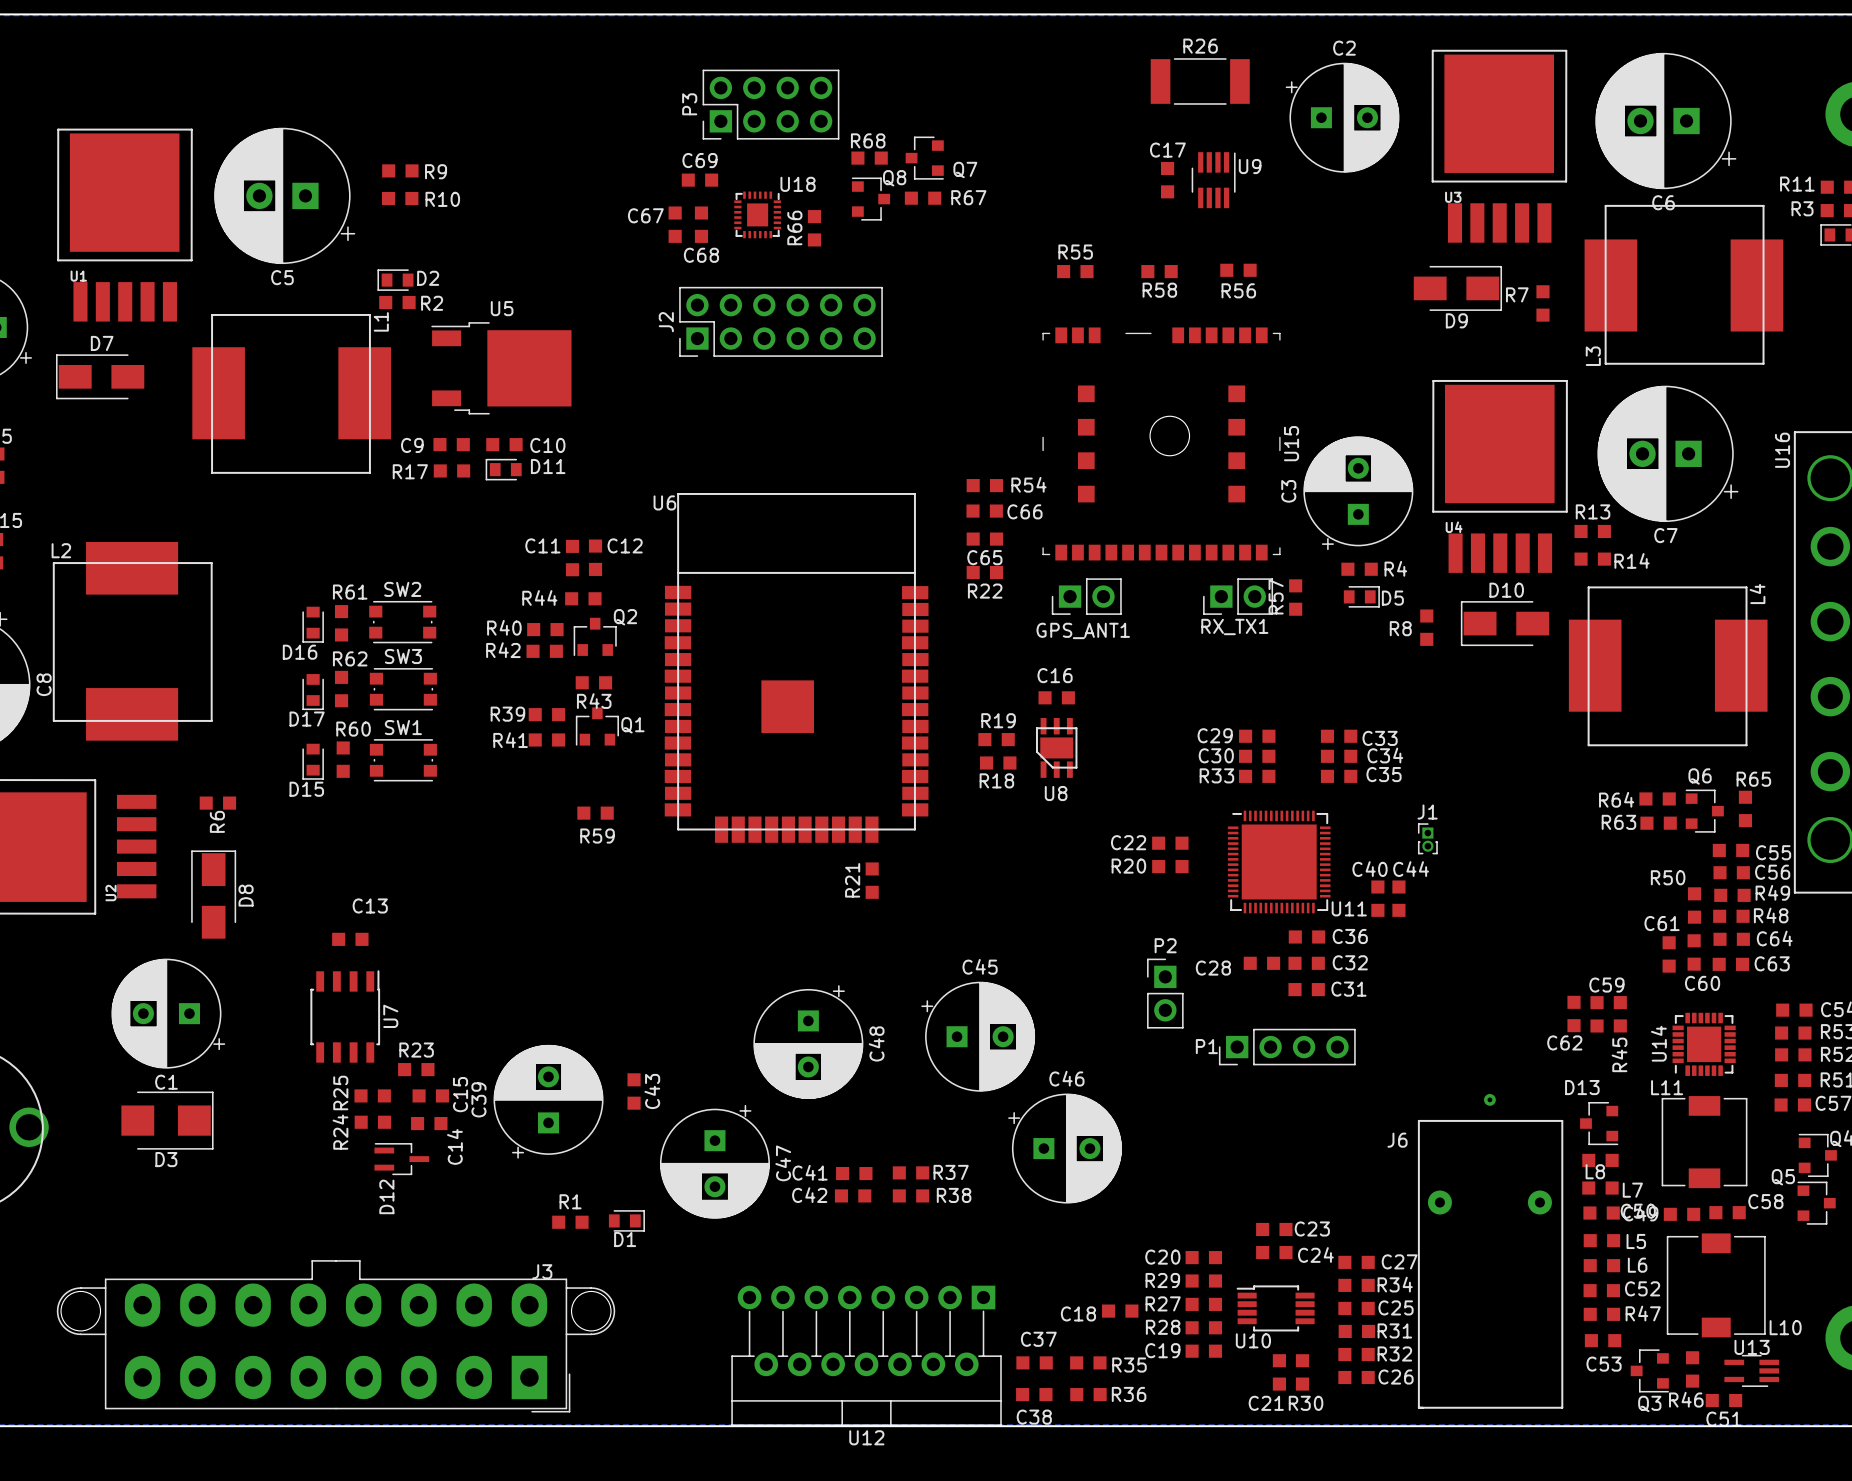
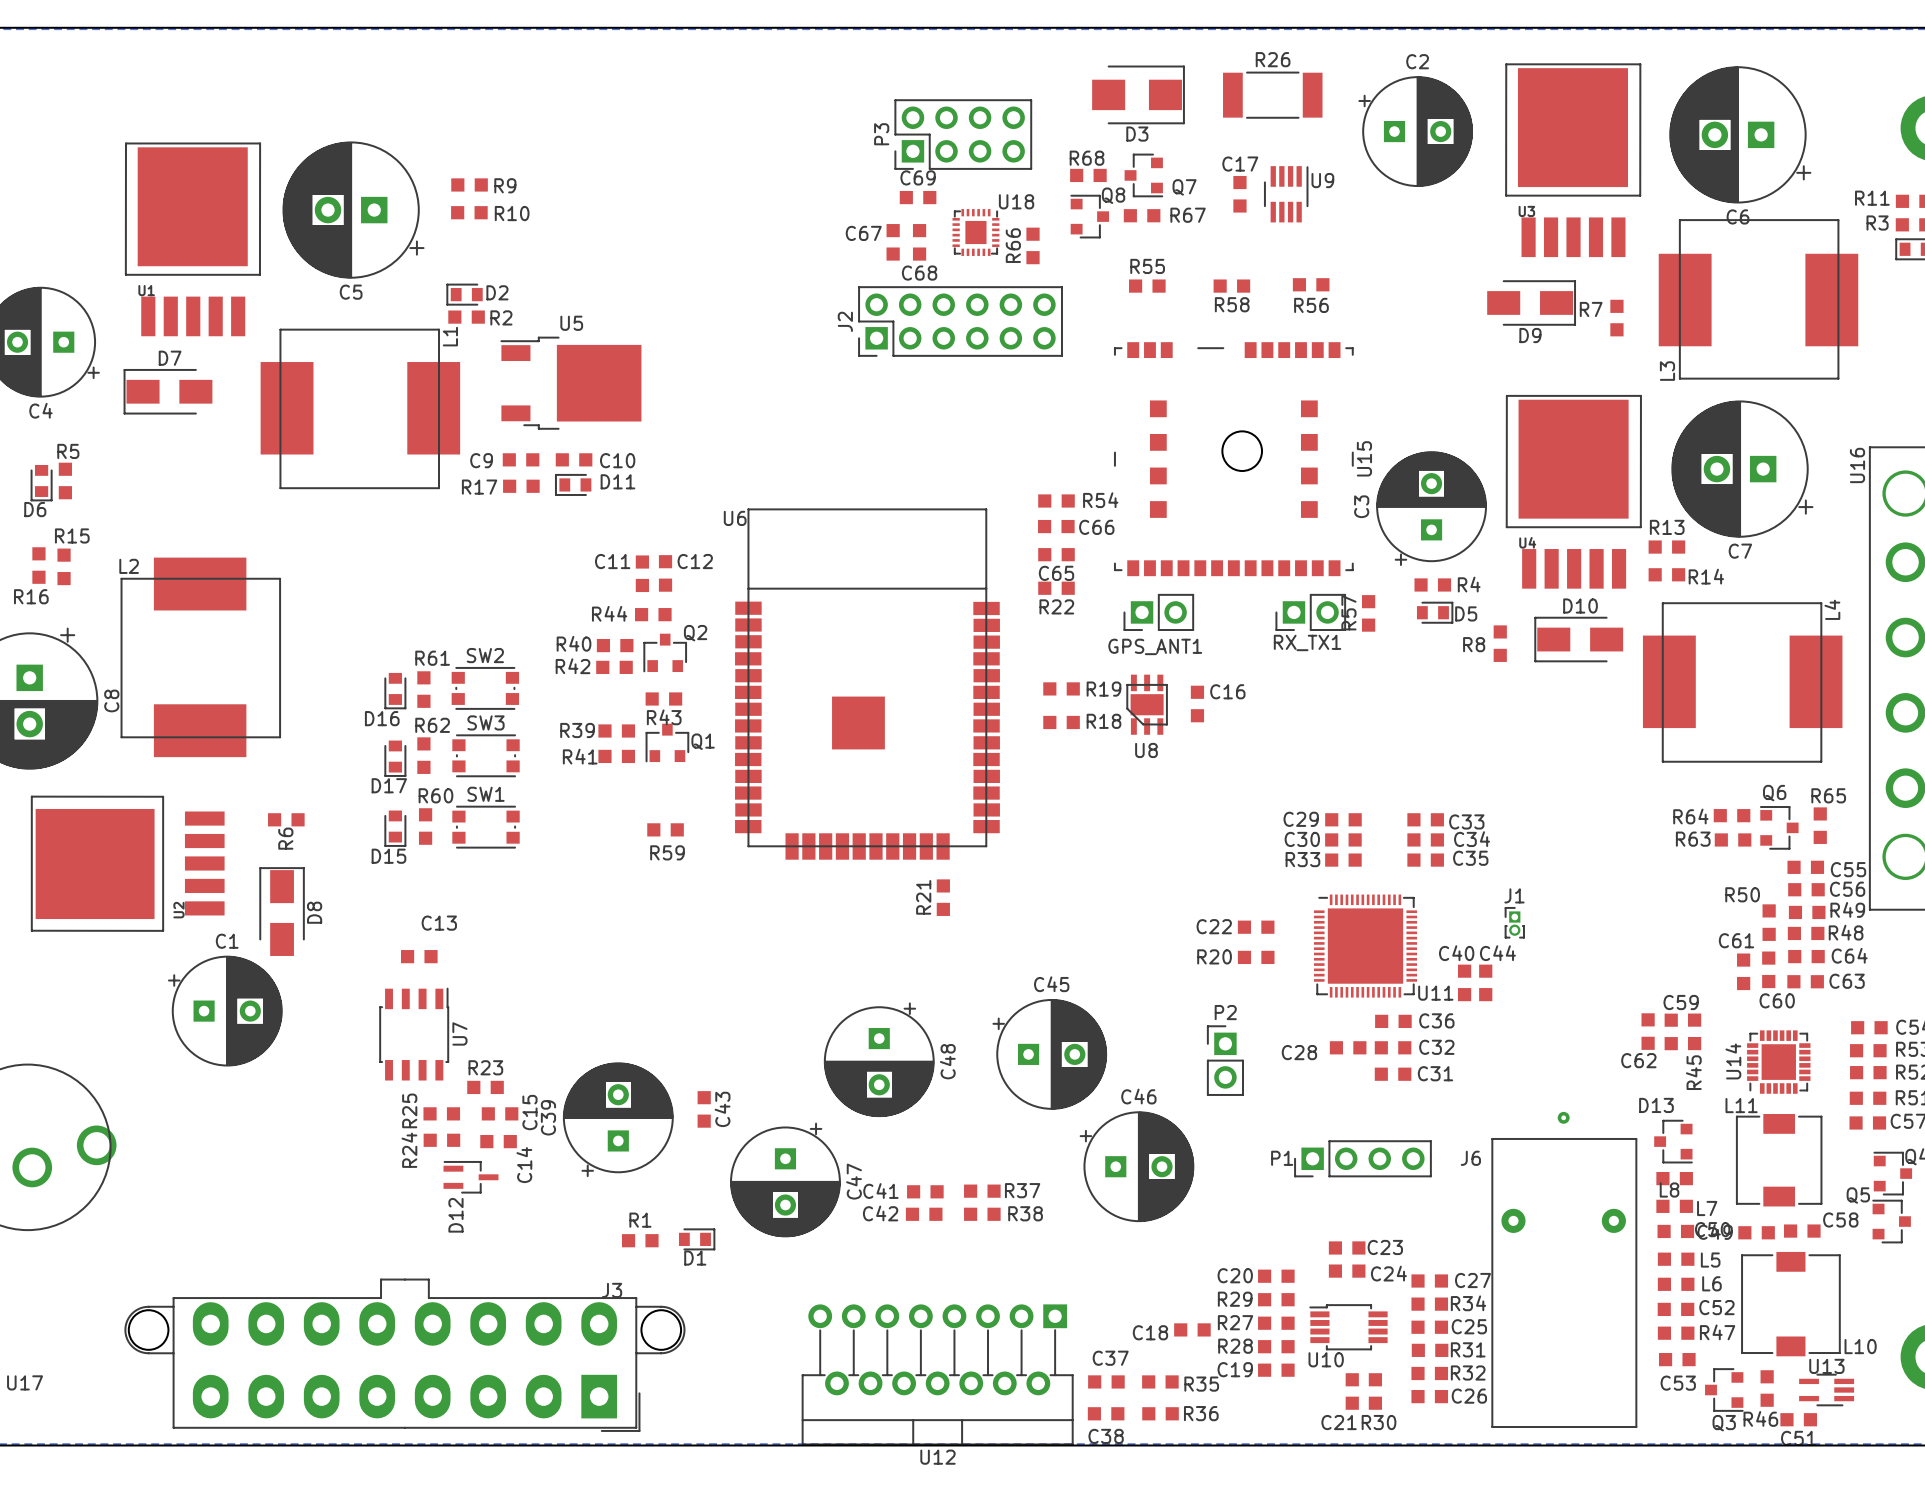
P3 position: (770, 104) -> (963, 134)
R68 position: (869, 158) -> (1088, 175)
Q7 position: (924, 158) -> (1143, 175)
C69 position: (699, 180) -> (918, 197)
R67 position: (923, 198) -> (1142, 215)
Q8 position: (870, 199) -> (1089, 216)
U18 position: (757, 214) -> (975, 232)
C67 position: (675, 224) -> (893, 242)
C68 position: (701, 224) -> (919, 242)
R66 position: (814, 228) -> (1033, 245)
J2 position: (781, 321) -> (960, 321)
SW2 position: (402, 622) -> (485, 688)
R61 position: (341, 623) -> (423, 689)
D16 position: (313, 624) -> (395, 691)
R62 position: (341, 689) -> (423, 755)
SW3 position: (403, 689) -> (486, 755)
D17 position: (313, 692) -> (395, 758)
C16 rotation: 0° (1056, 697) -> 90° clockwise (1197, 704)
C16 position: (1056, 697) -> (1197, 704)
R19 name position: R19 (998, 720) -> R19 (1103, 689)
C29 position: (1257, 736) -> (1343, 819)
C33 position: (1339, 736) -> (1425, 819)
R19 position: (996, 739) -> (1061, 688)
U8 position: (1056, 747) -> (1147, 704)
C30 position: (1257, 756) -> (1343, 839)
C34 position: (1339, 756) -> (1425, 839)
R60 position: (343, 759) -> (425, 826)
SW1 position: (403, 760) -> (486, 827)
D15 position: (313, 761) -> (395, 828)
R18 position: (998, 762) -> (1061, 722)
R33 position: (1257, 776) -> (1343, 860)
C35 position: (1339, 776) -> (1425, 860)
R18 name position: R18 (996, 780) -> R18 (1103, 721)
J1 position: (1427, 838) -> (1514, 922)
C22 position: (1170, 843) -> (1256, 927)
U11 position: (1279, 861) -> (1365, 946)
R20 position: (1170, 866) -> (1256, 957)
C40 position: (1377, 898) -> (1464, 982)
C44 position: (1398, 898) -> (1485, 982)
C36 position: (1307, 936) -> (1393, 1021)
C28 position: (1261, 963) -> (1348, 1047)
C32 position: (1306, 963) -> (1393, 1047)
C31 position: (1306, 989) -> (1393, 1074)
P2 position: (1165, 993) -> (1225, 1060)
C1 rotation: 0° (168, 1013) -> 180° (225, 1011)
P1 position: (1287, 1047) -> (1362, 1158)
D3 position: (167, 1120) -> (1138, 94)

